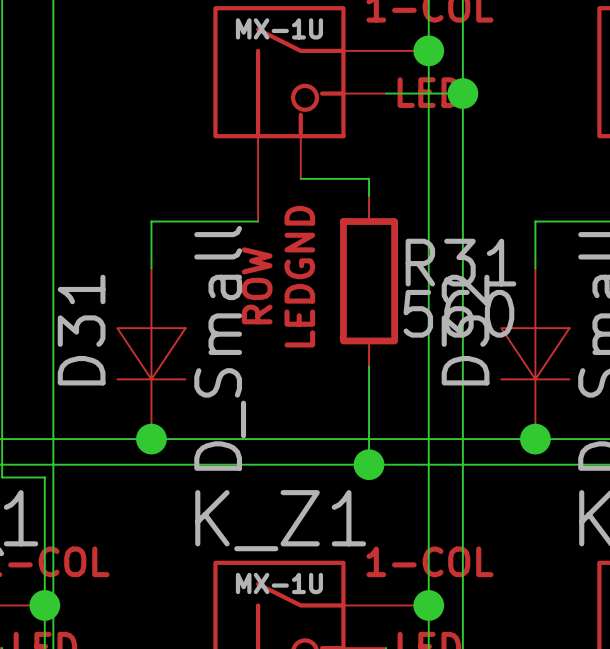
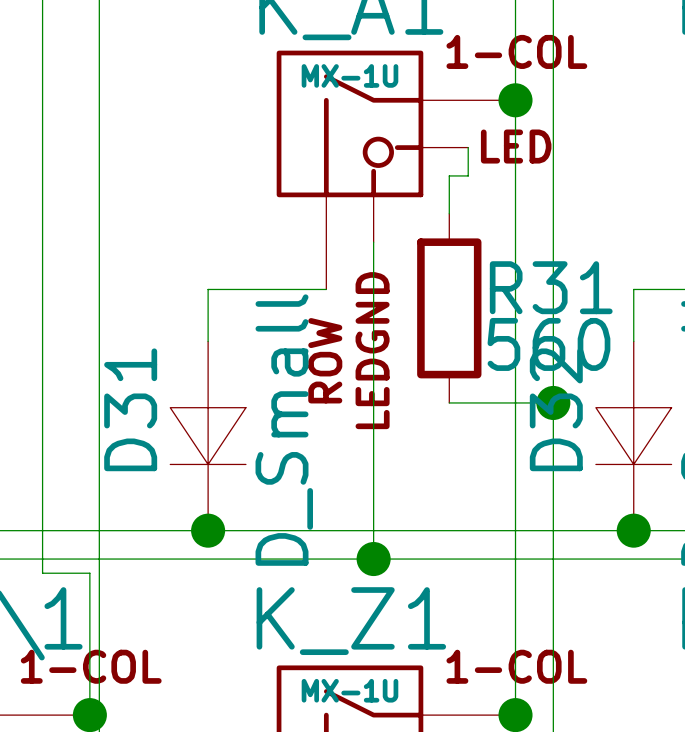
wire: (386, 93) (462, 93) -> (468, 147) (468, 175) (449, 175) (449, 213)
junction: (462, 93) -> none
wire: (300, 178) (369, 178) (369, 195) -> (373, 242) (373, 559)
R31 position: (369, 281) -> (449, 308)
wire: none -> (449, 402) (553, 402)
junction: none -> (553, 402)
wire: (369, 366) (369, 464) -> none
junction position: (369, 464) -> (373, 559)

